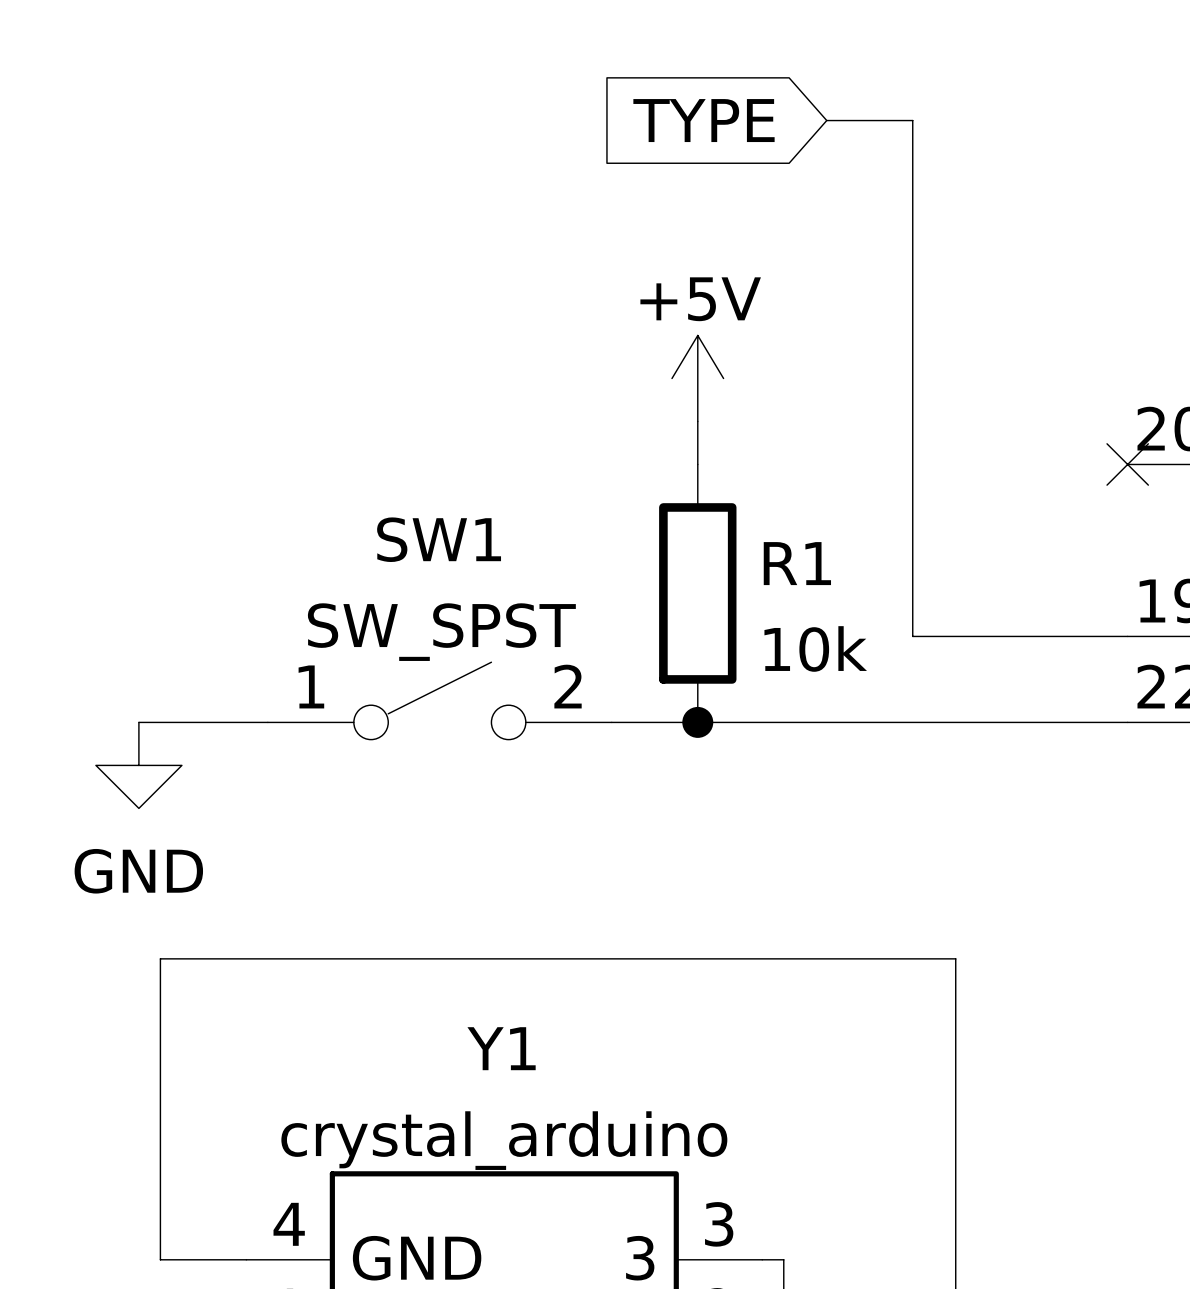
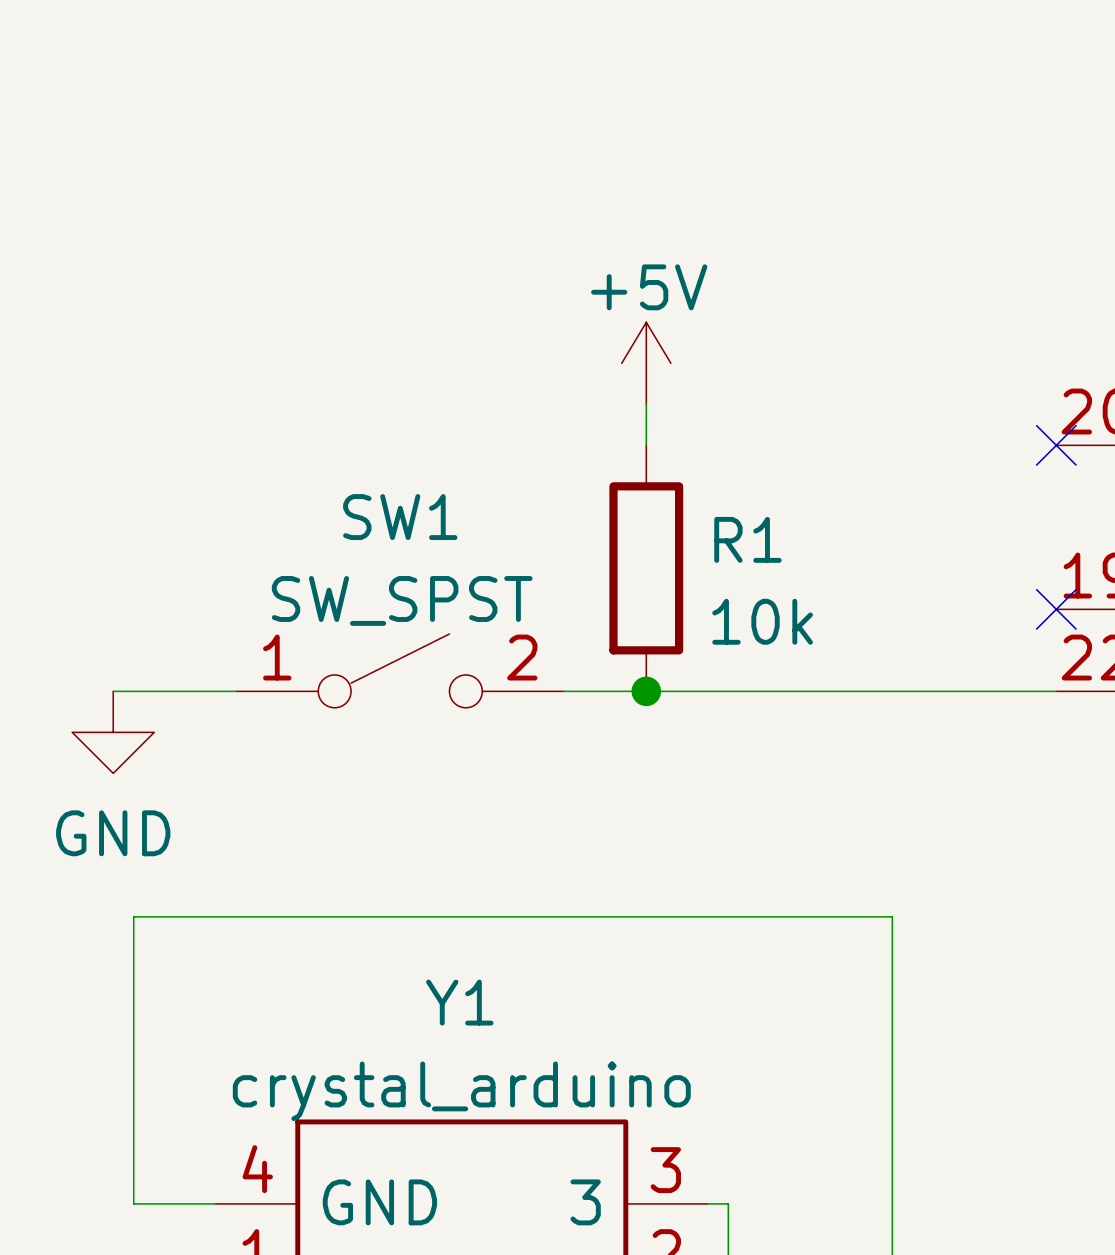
global label: TYPE (703, 120) -> none
wire: (826, 120) (912, 120) (912, 636) (1127, 636) -> none
no-connect mark: none -> (1056, 609)

